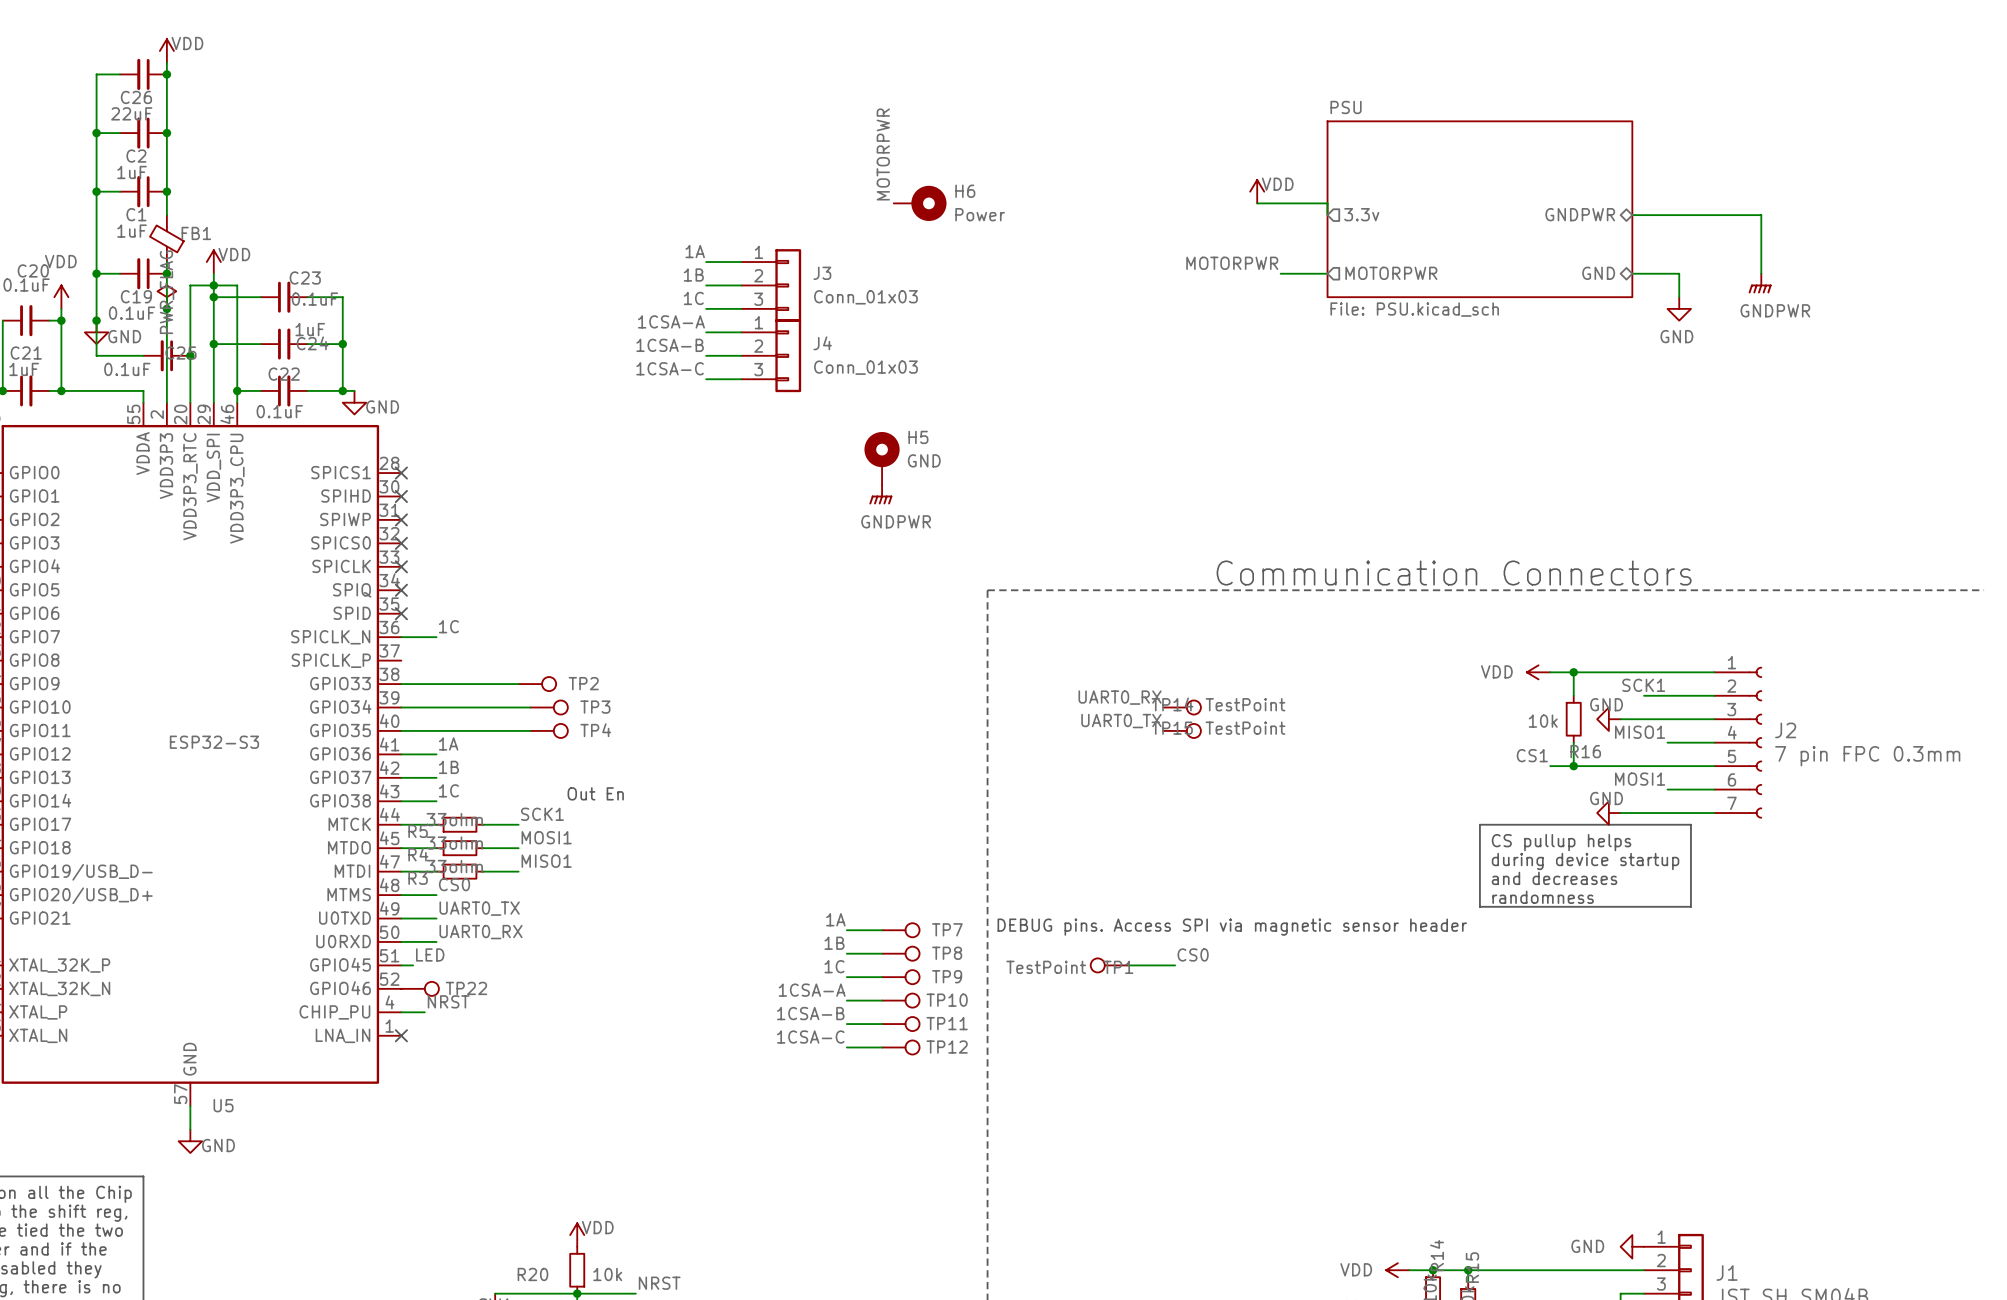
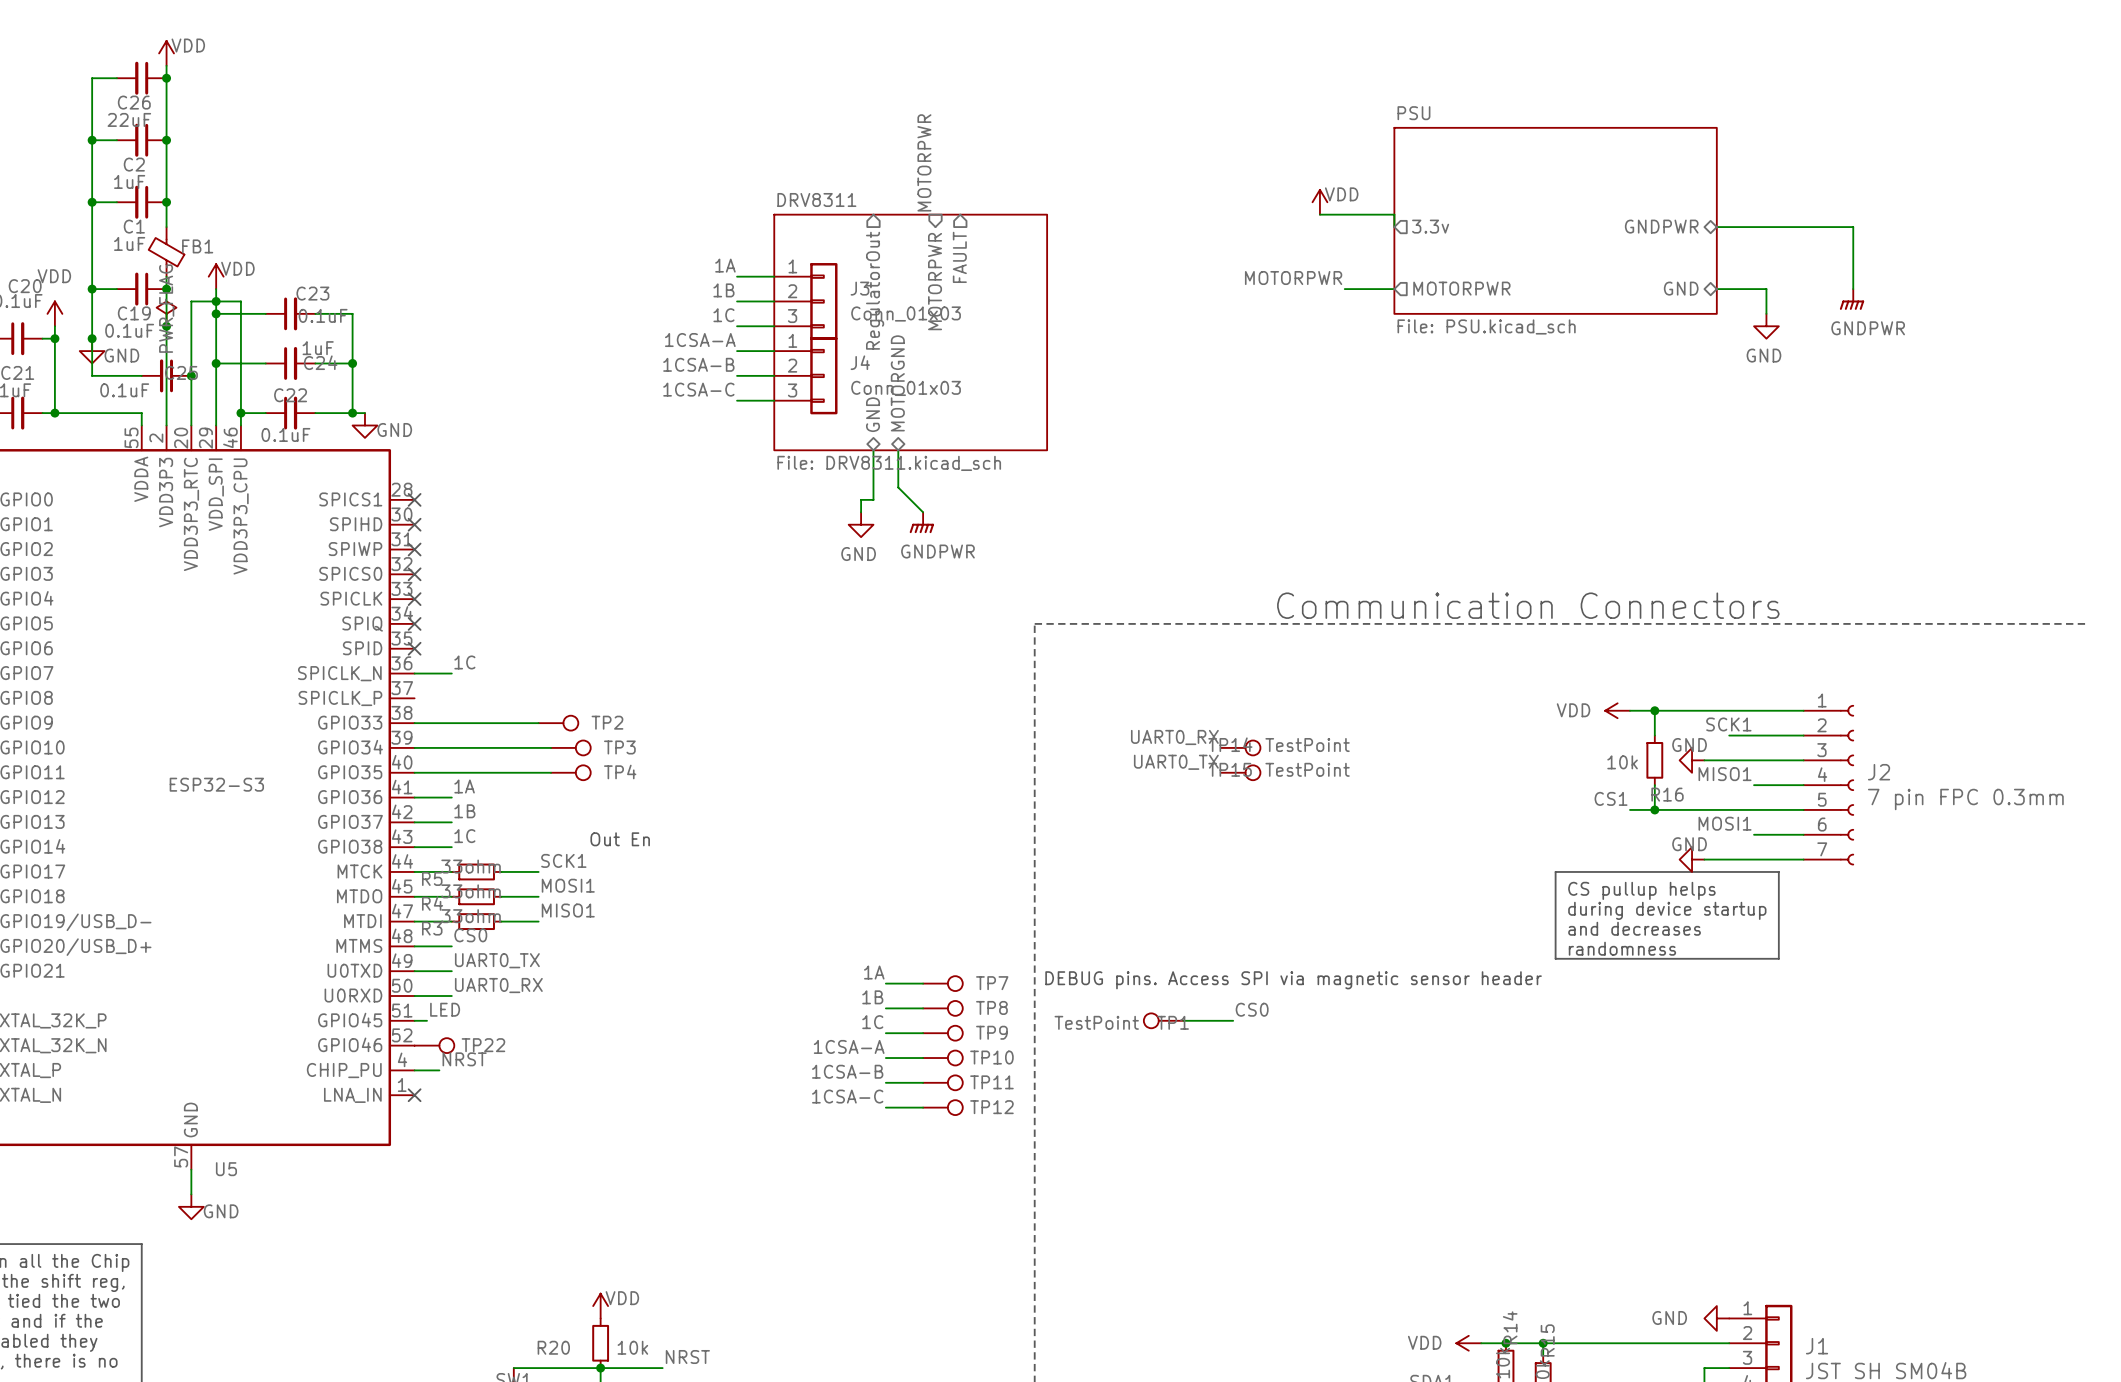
H6: Power (920, 203) -> none
sheet pin: none -> FAULT (959, 257)
sheet pin: none -> MOTORPWR (935, 281)
sheet pin: none -> RegulatorOut (875, 290)
sheet DRV8311: none -> File: DRV8311.kicad_sch (910, 332)
sheet pin: none -> MOTORGND (897, 383)
sheet pin: none -> GND (873, 414)
wire: none -> (873, 450) (873, 499) (861, 499) (861, 512)
wire: none -> (898, 450) (898, 487) (923, 512)
H5: GND (882, 458) -> none
power symbol: none -> GND (861, 524)

